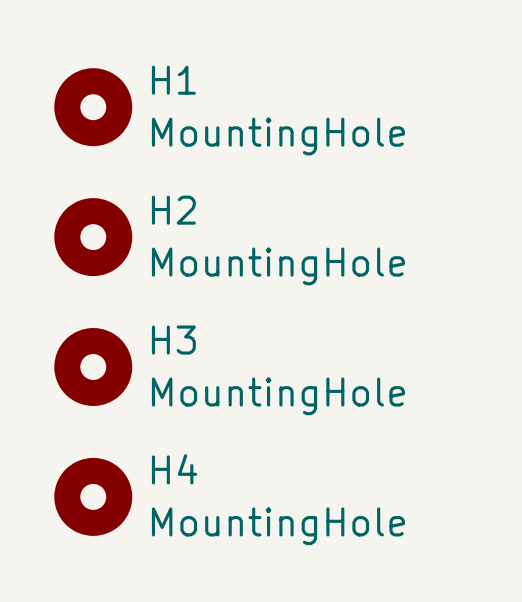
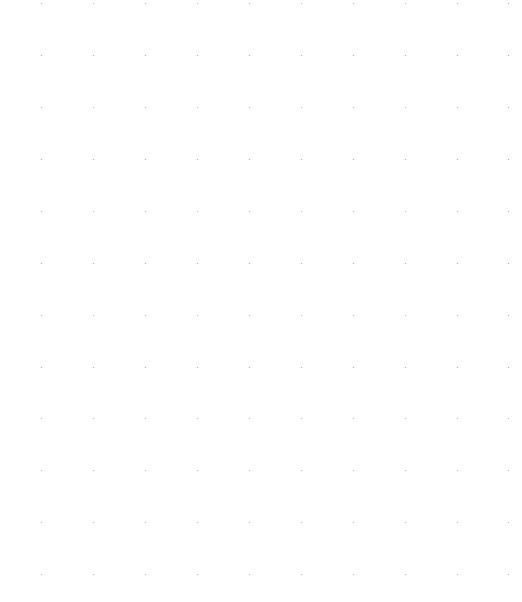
H1: MountingHole (93, 107) -> none
H2: MountingHole (93, 237) -> none
H3: MountingHole (93, 367) -> none
H4: MountingHole (93, 496) -> none

